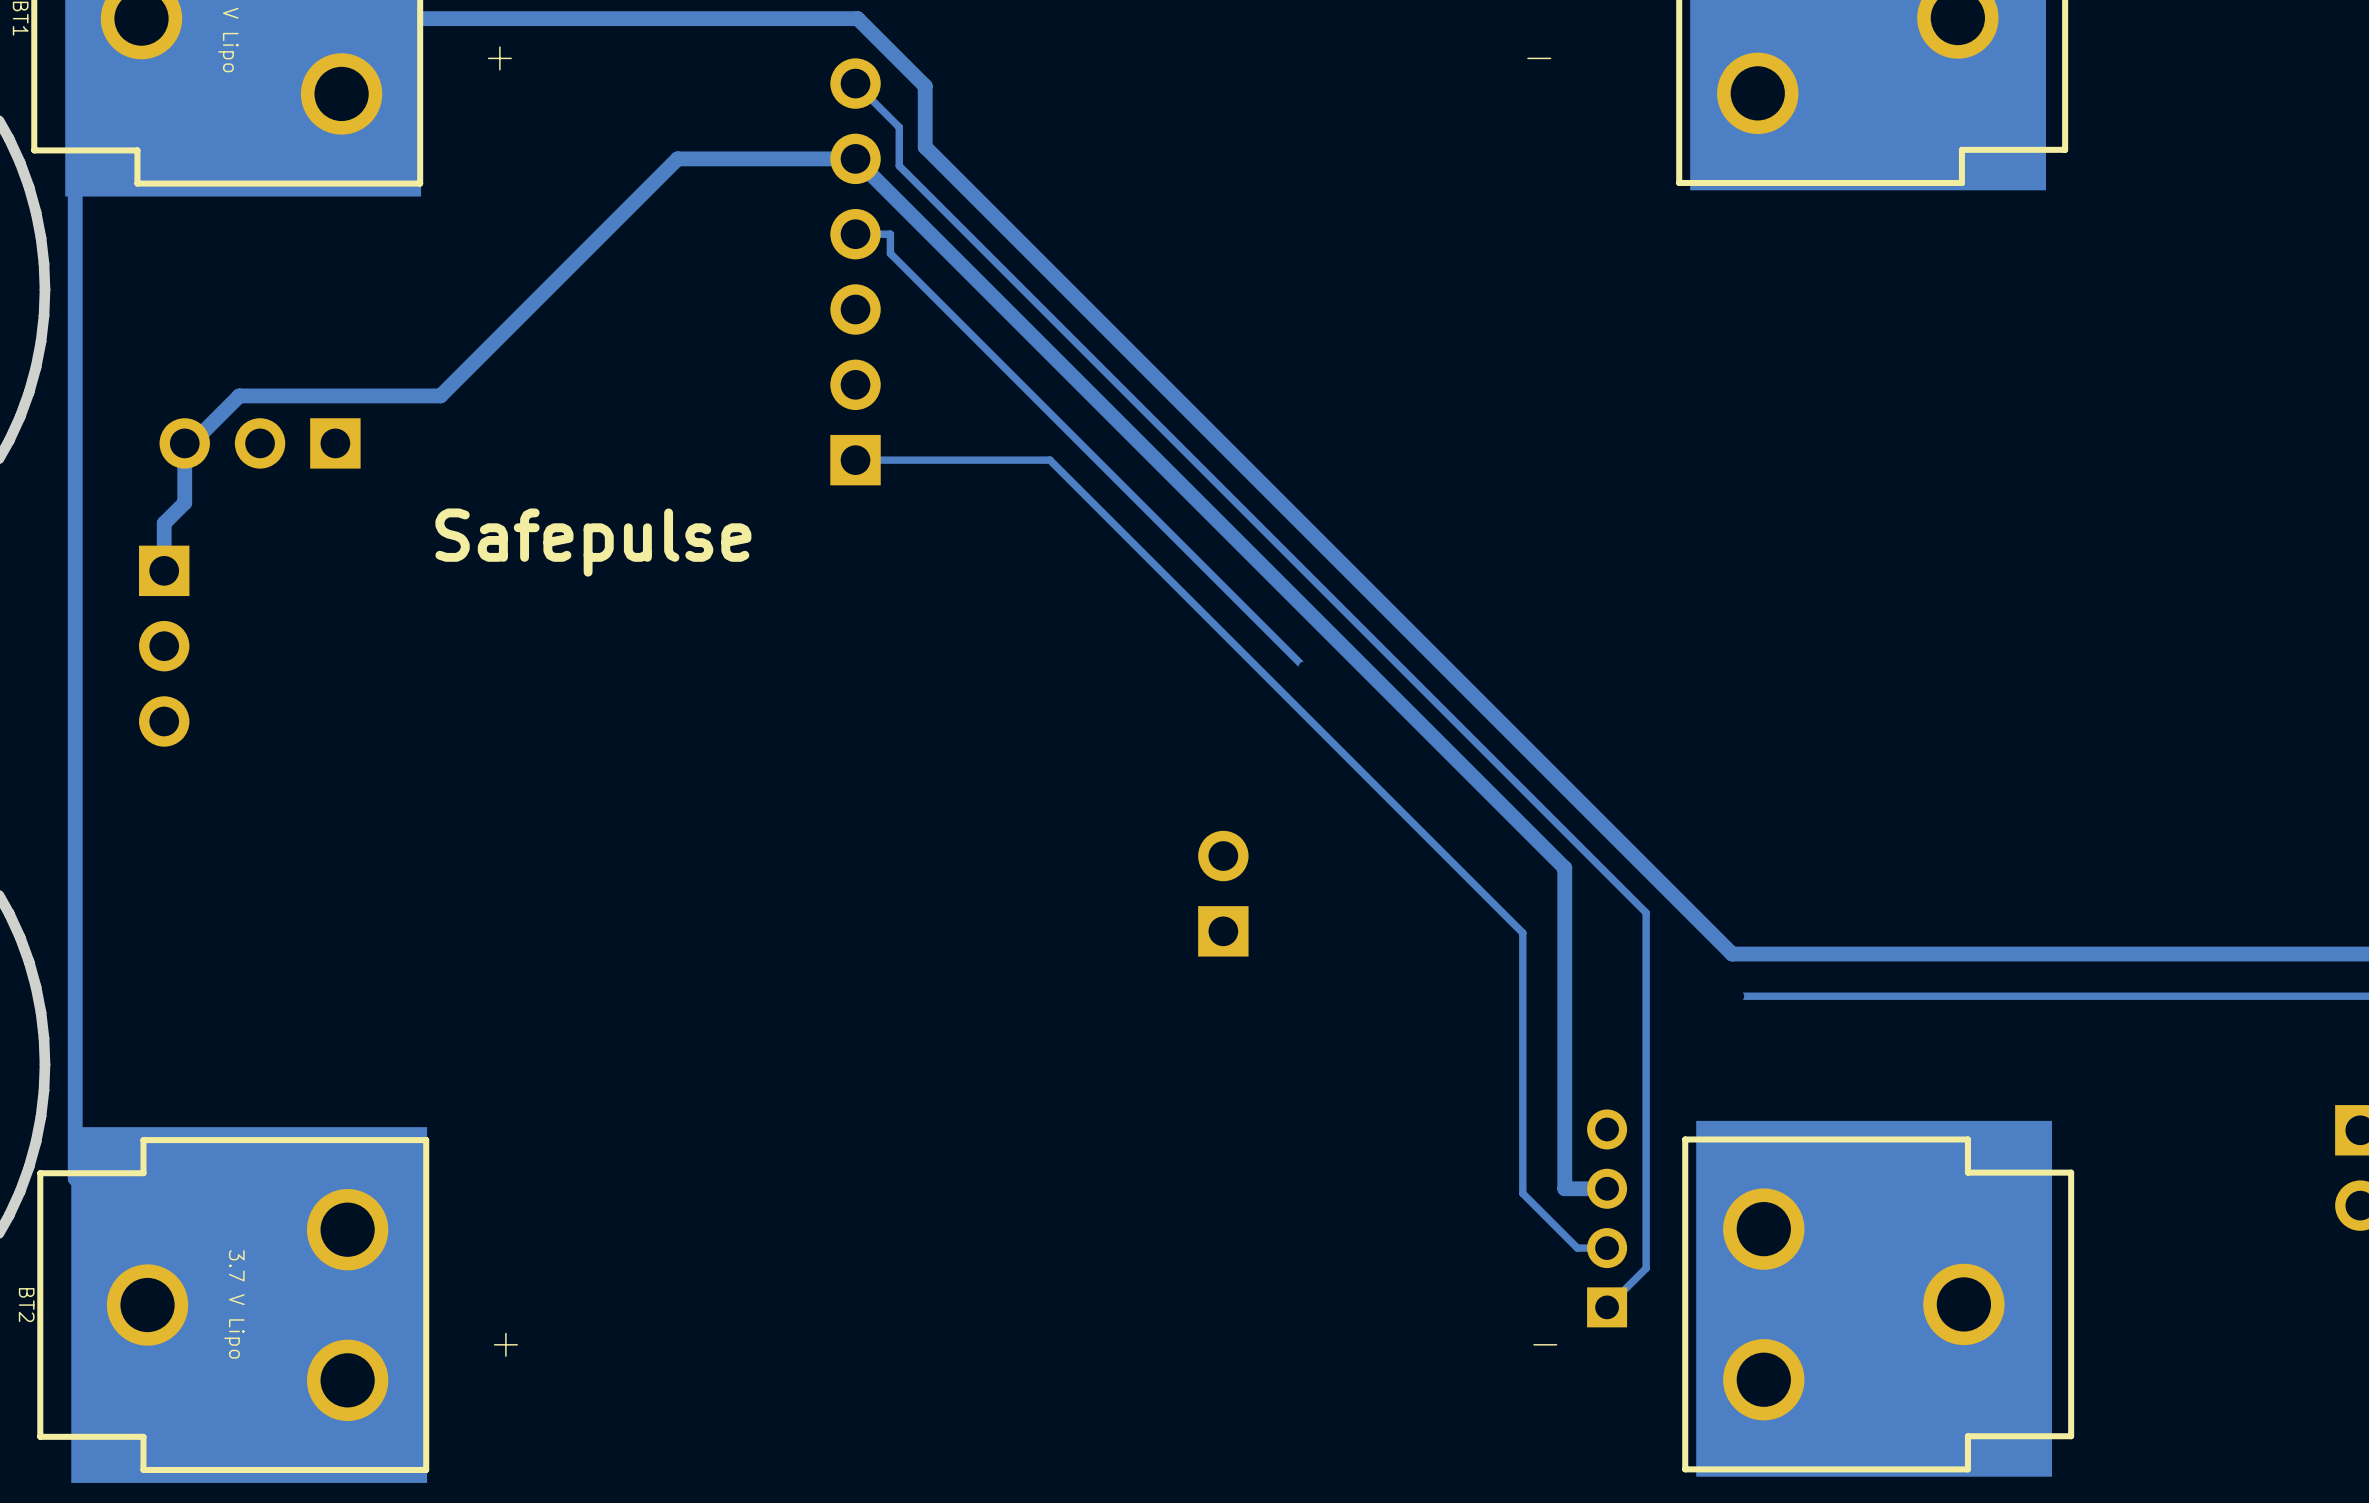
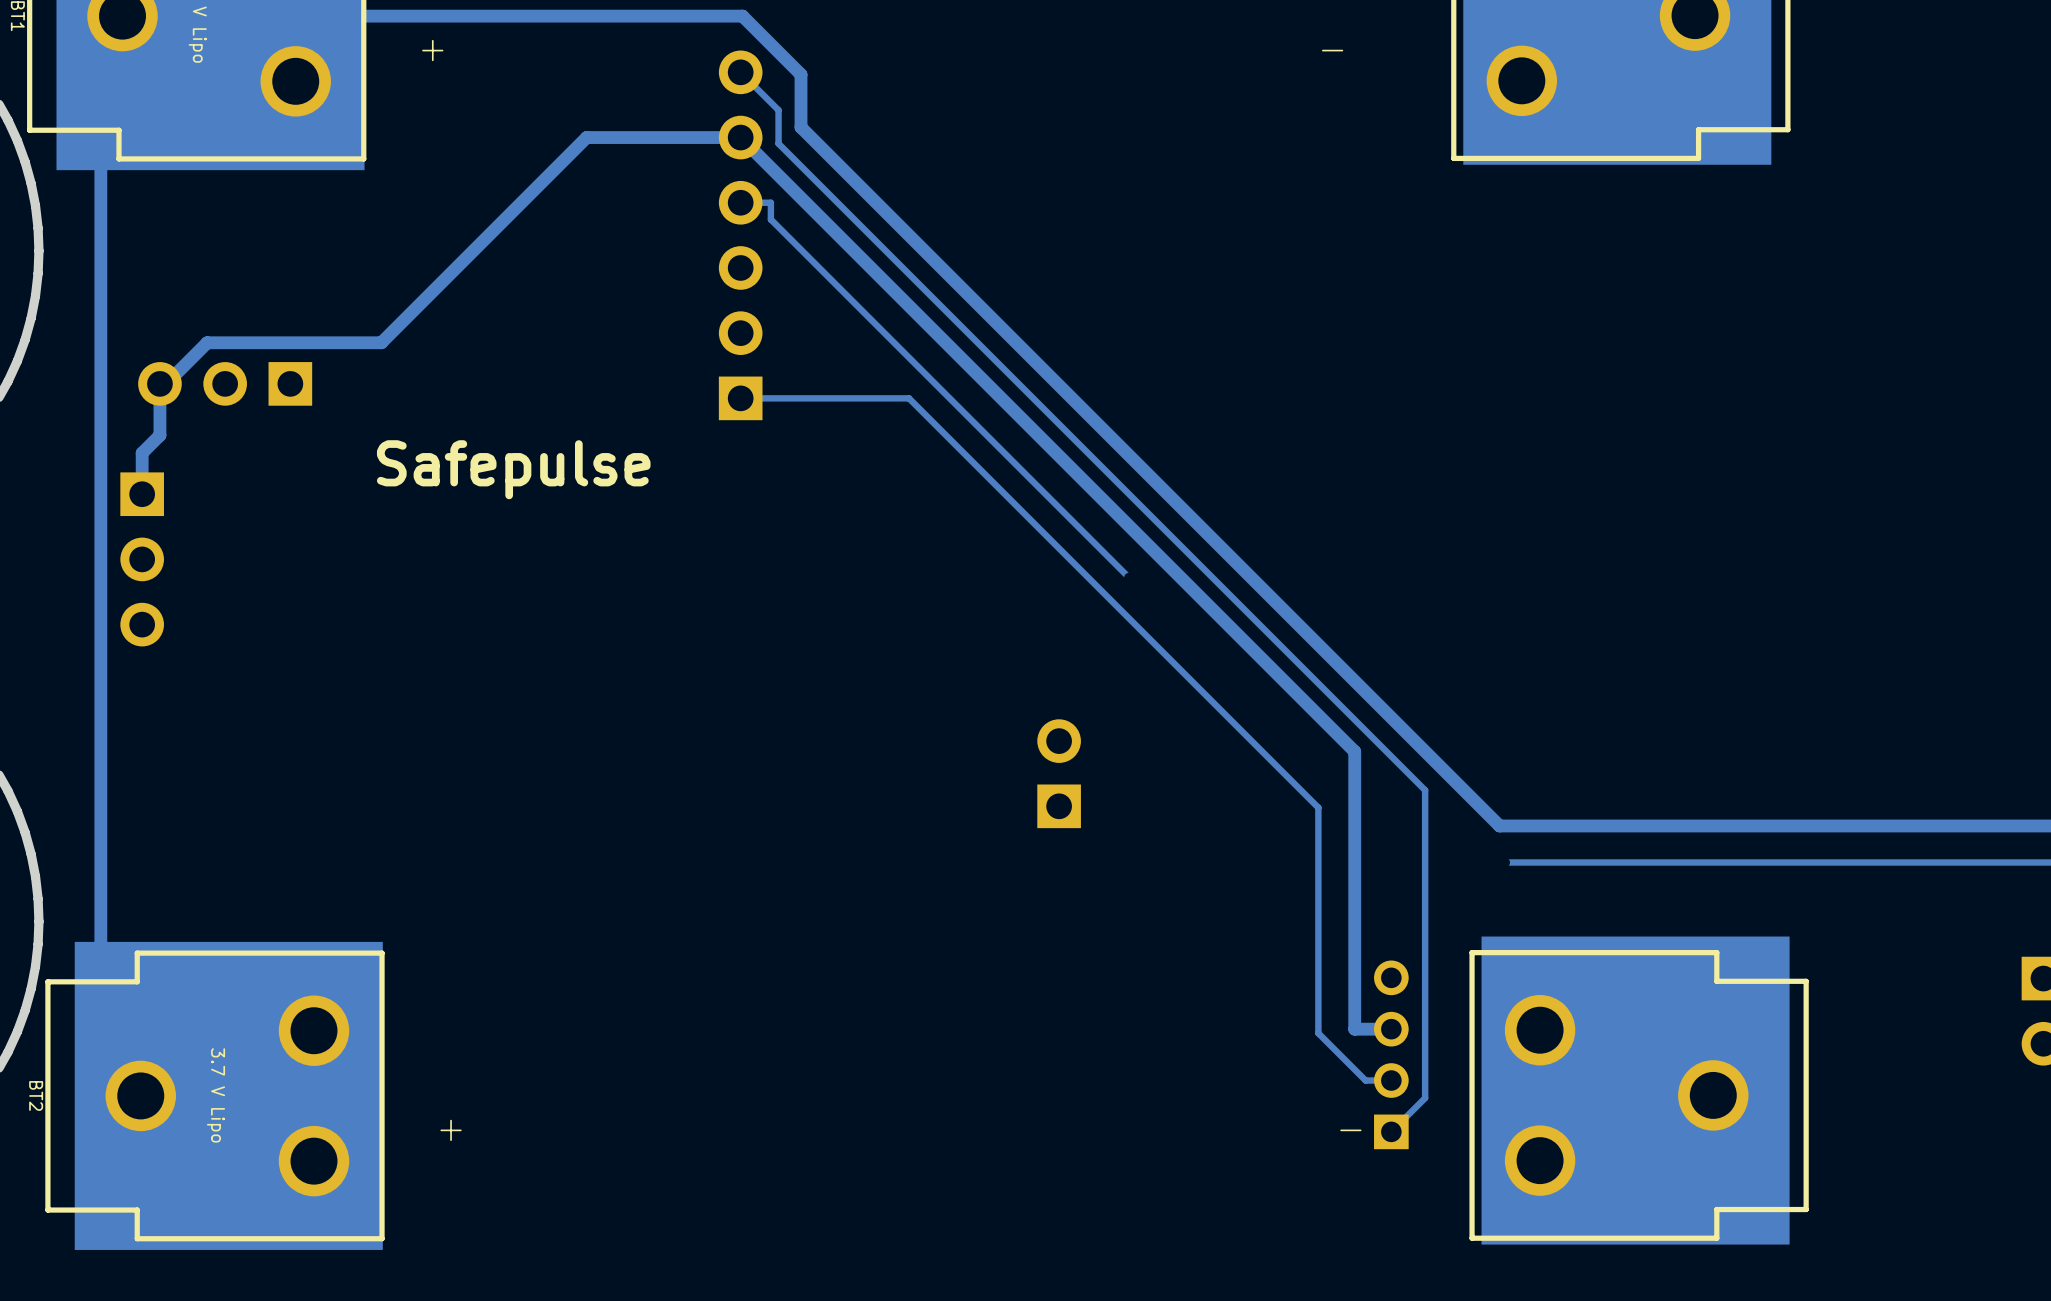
track: (116, 43) (75, 84) (75, 1178) (116, 1219) -> (100, 37) (100, 1056)
BT2 position: (1055, 1301) -> (927, 1093)

